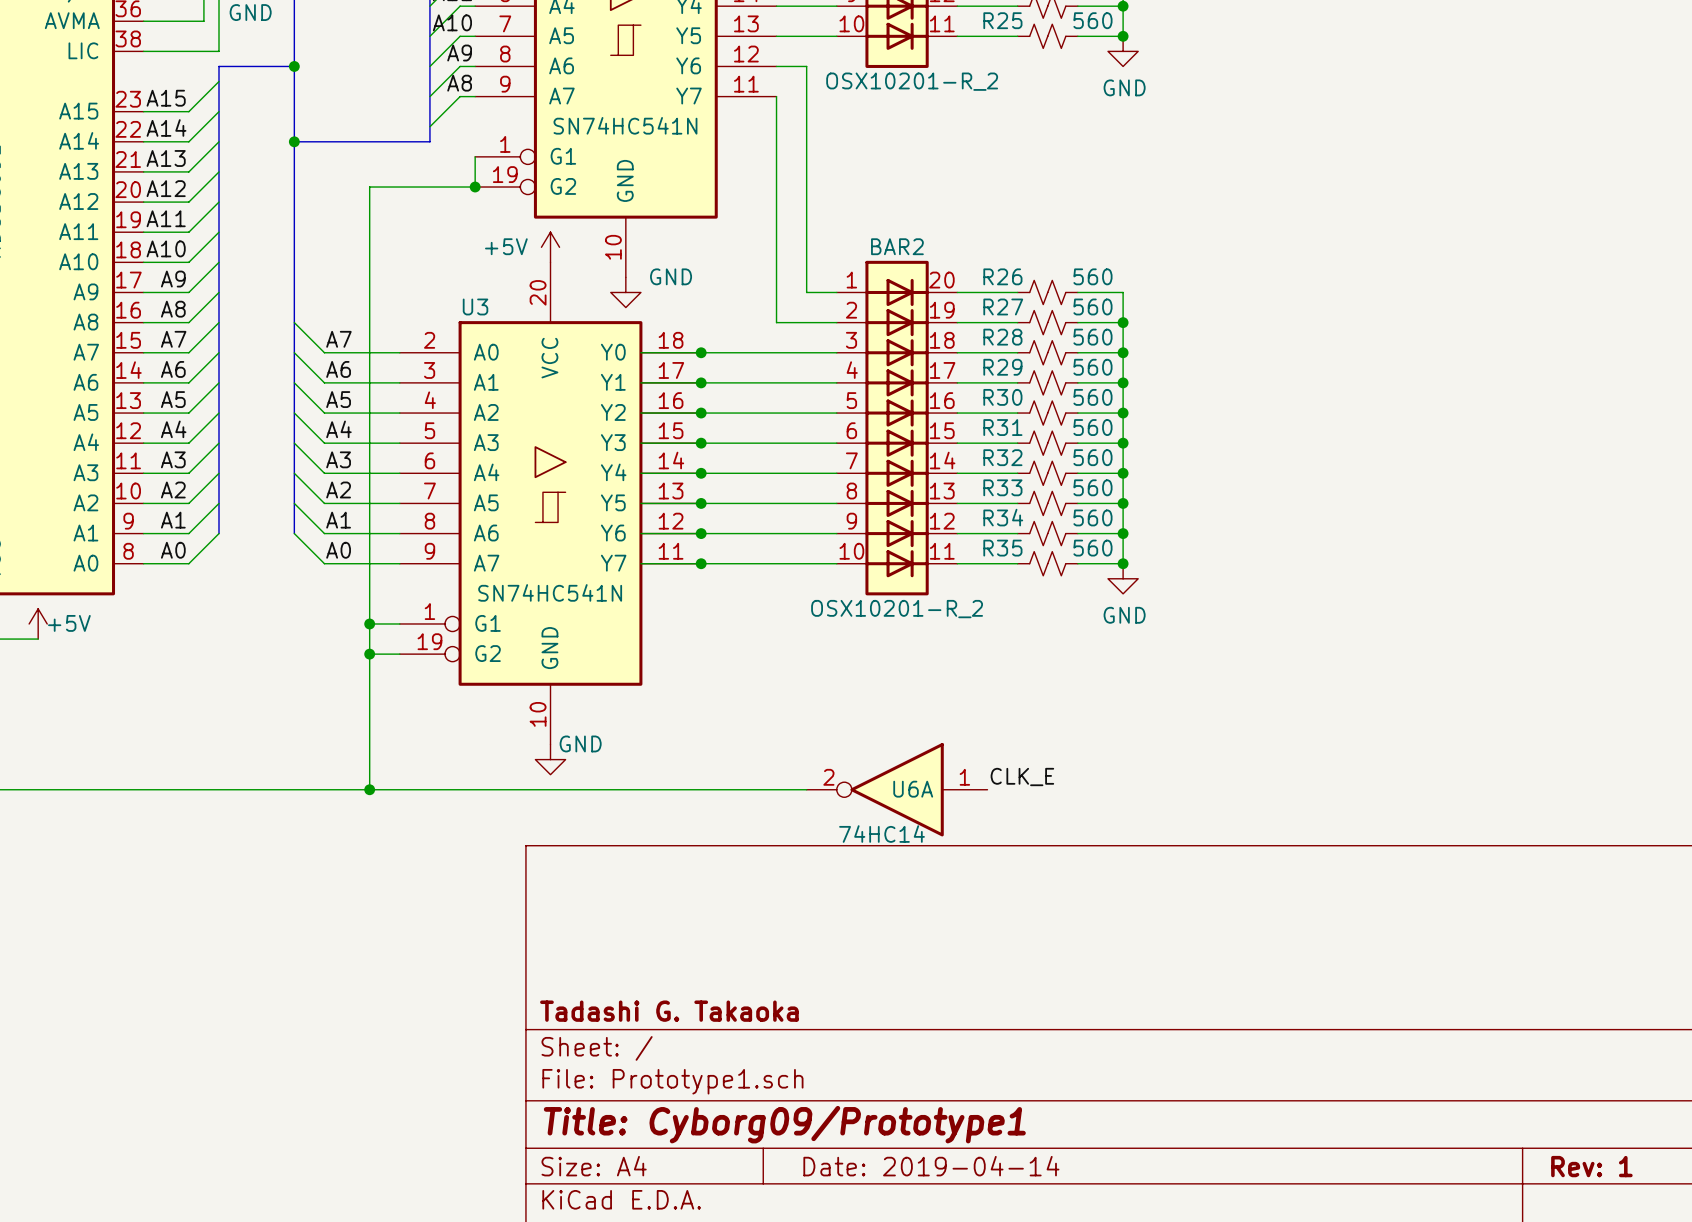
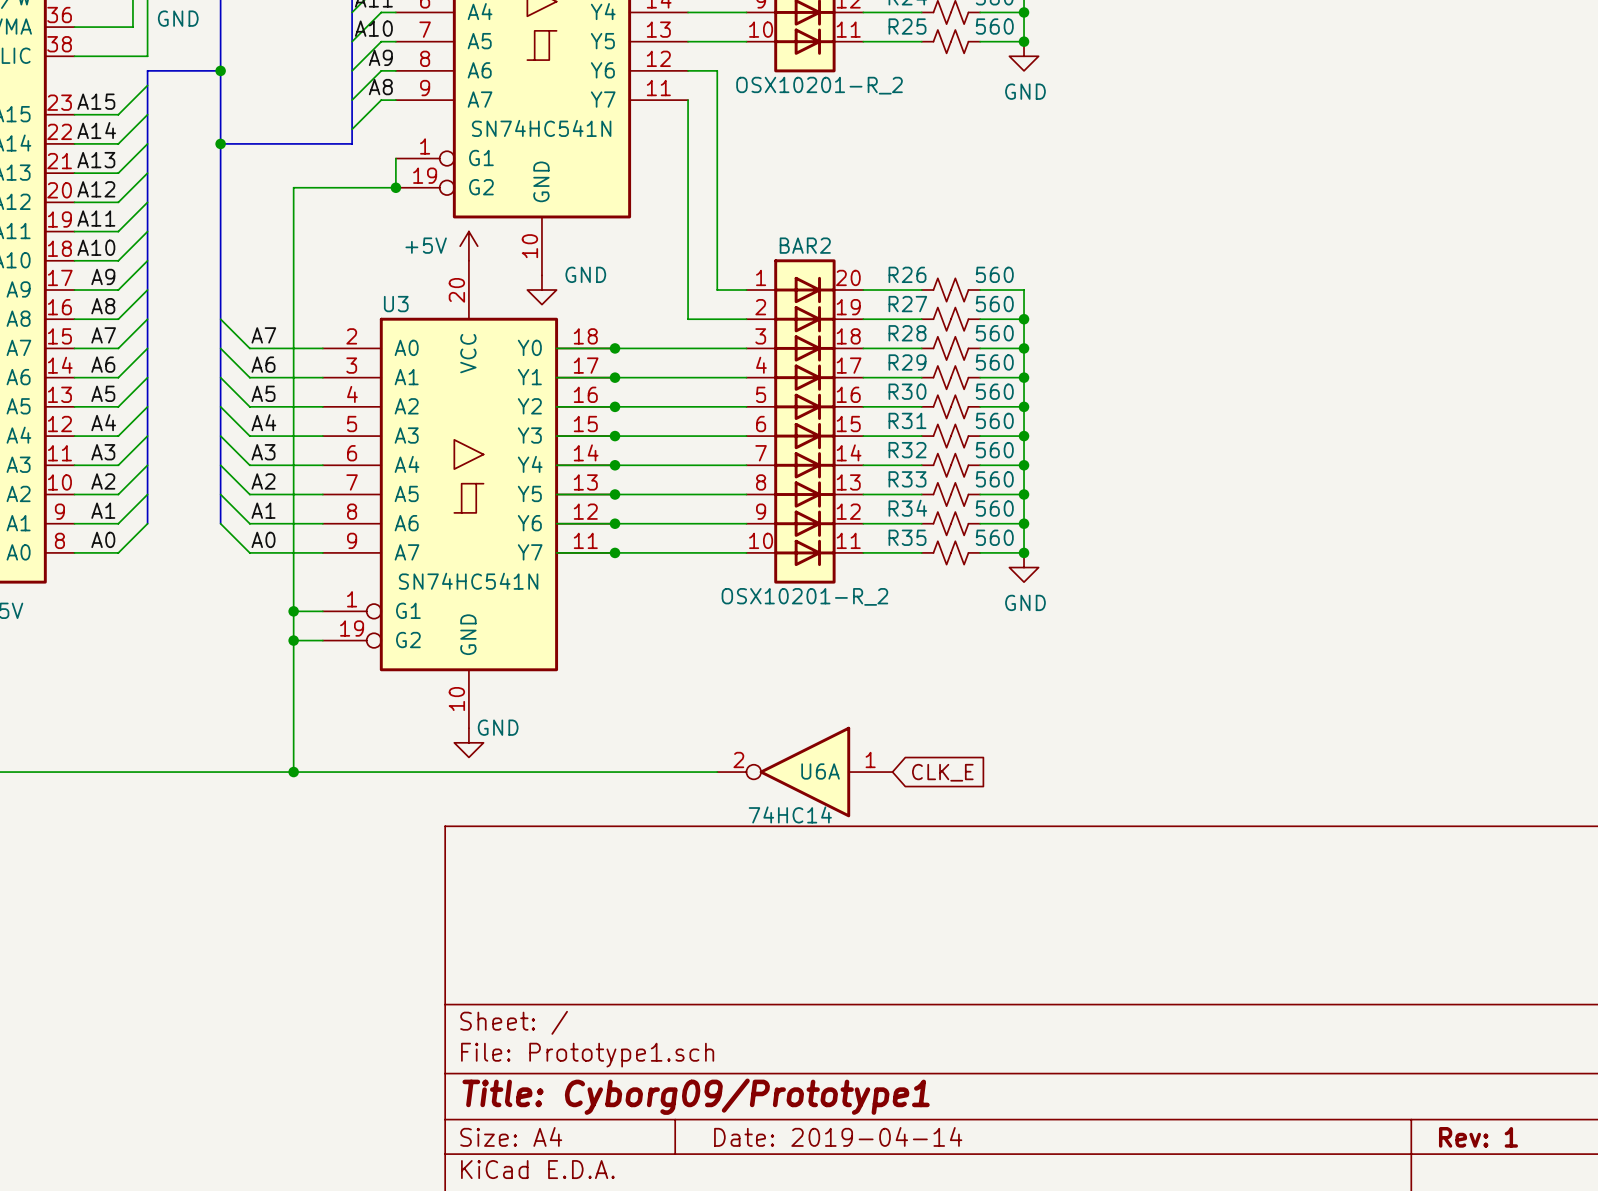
label: CLK_E (1022, 777) -> none
global label: none -> CLK_E (942, 772)
title block: Tadashi G. Takaoka (669, 1011) -> none

